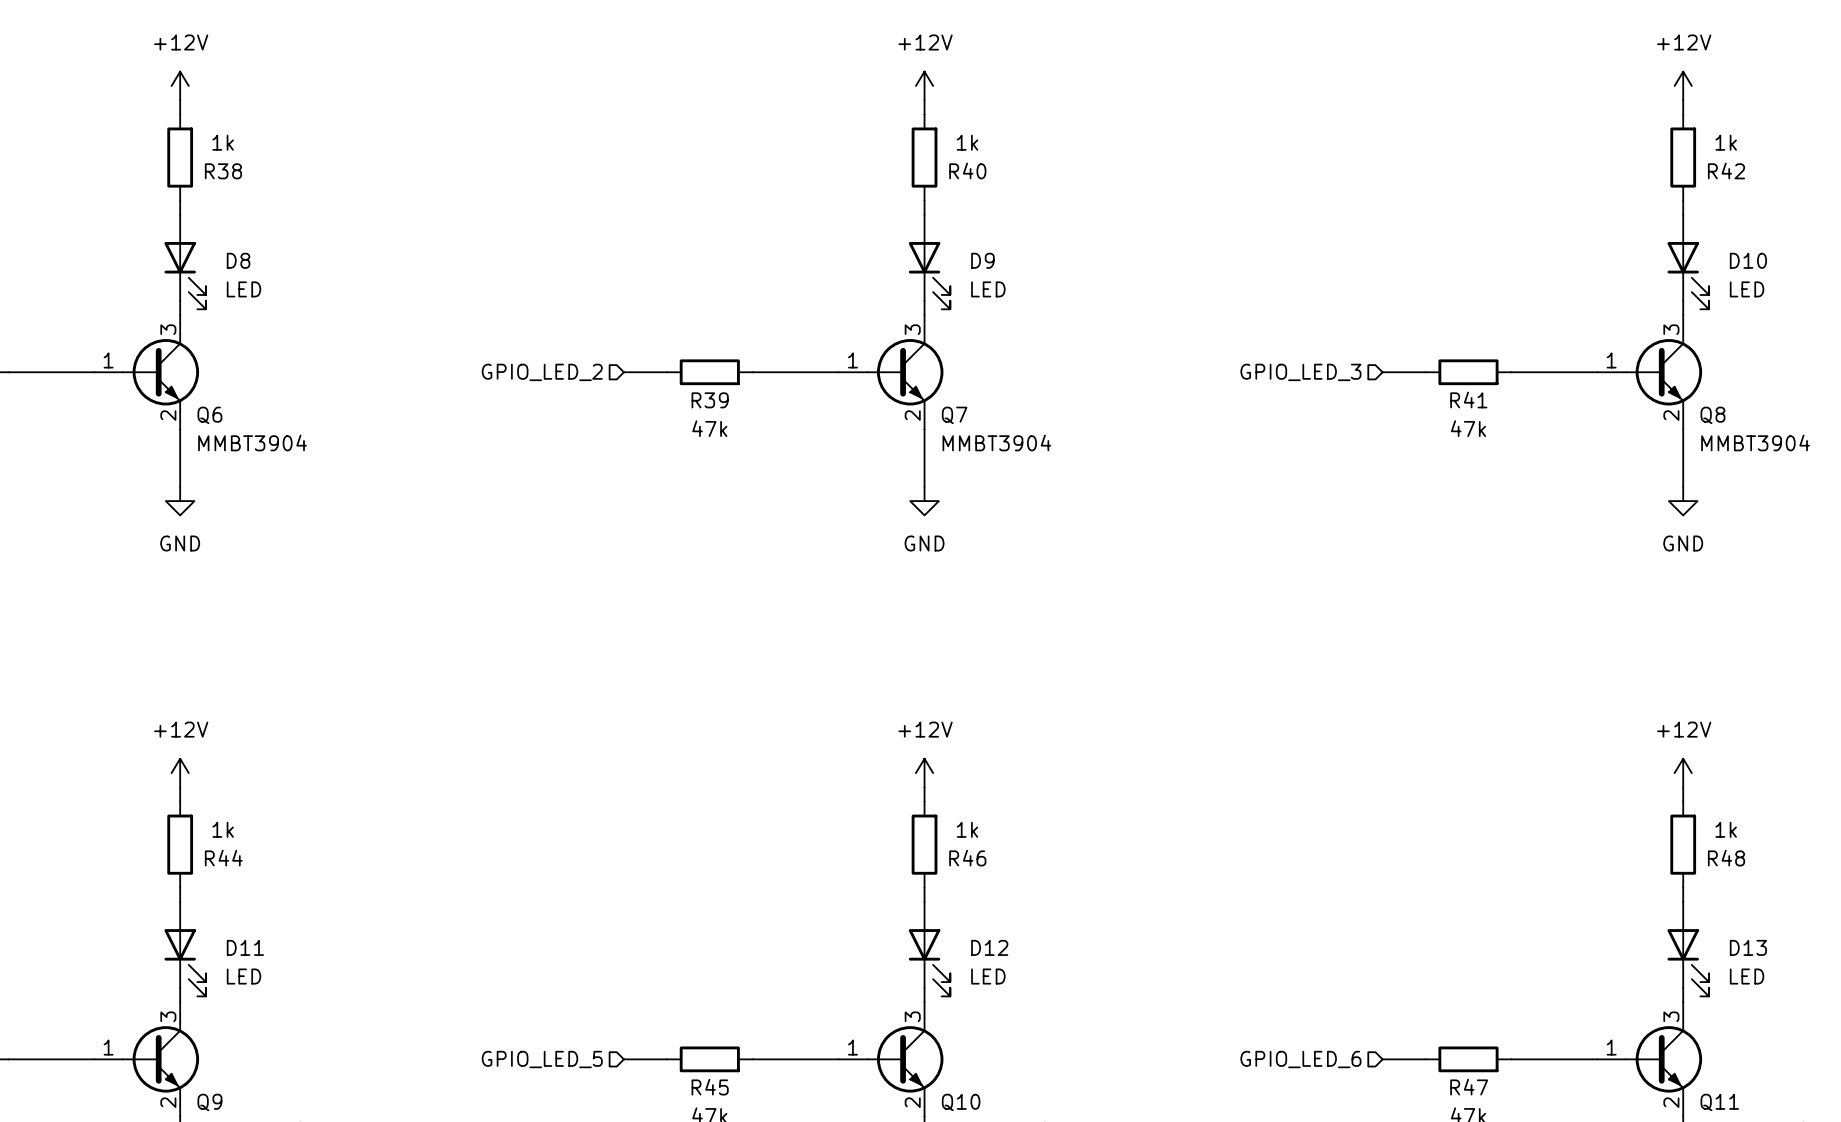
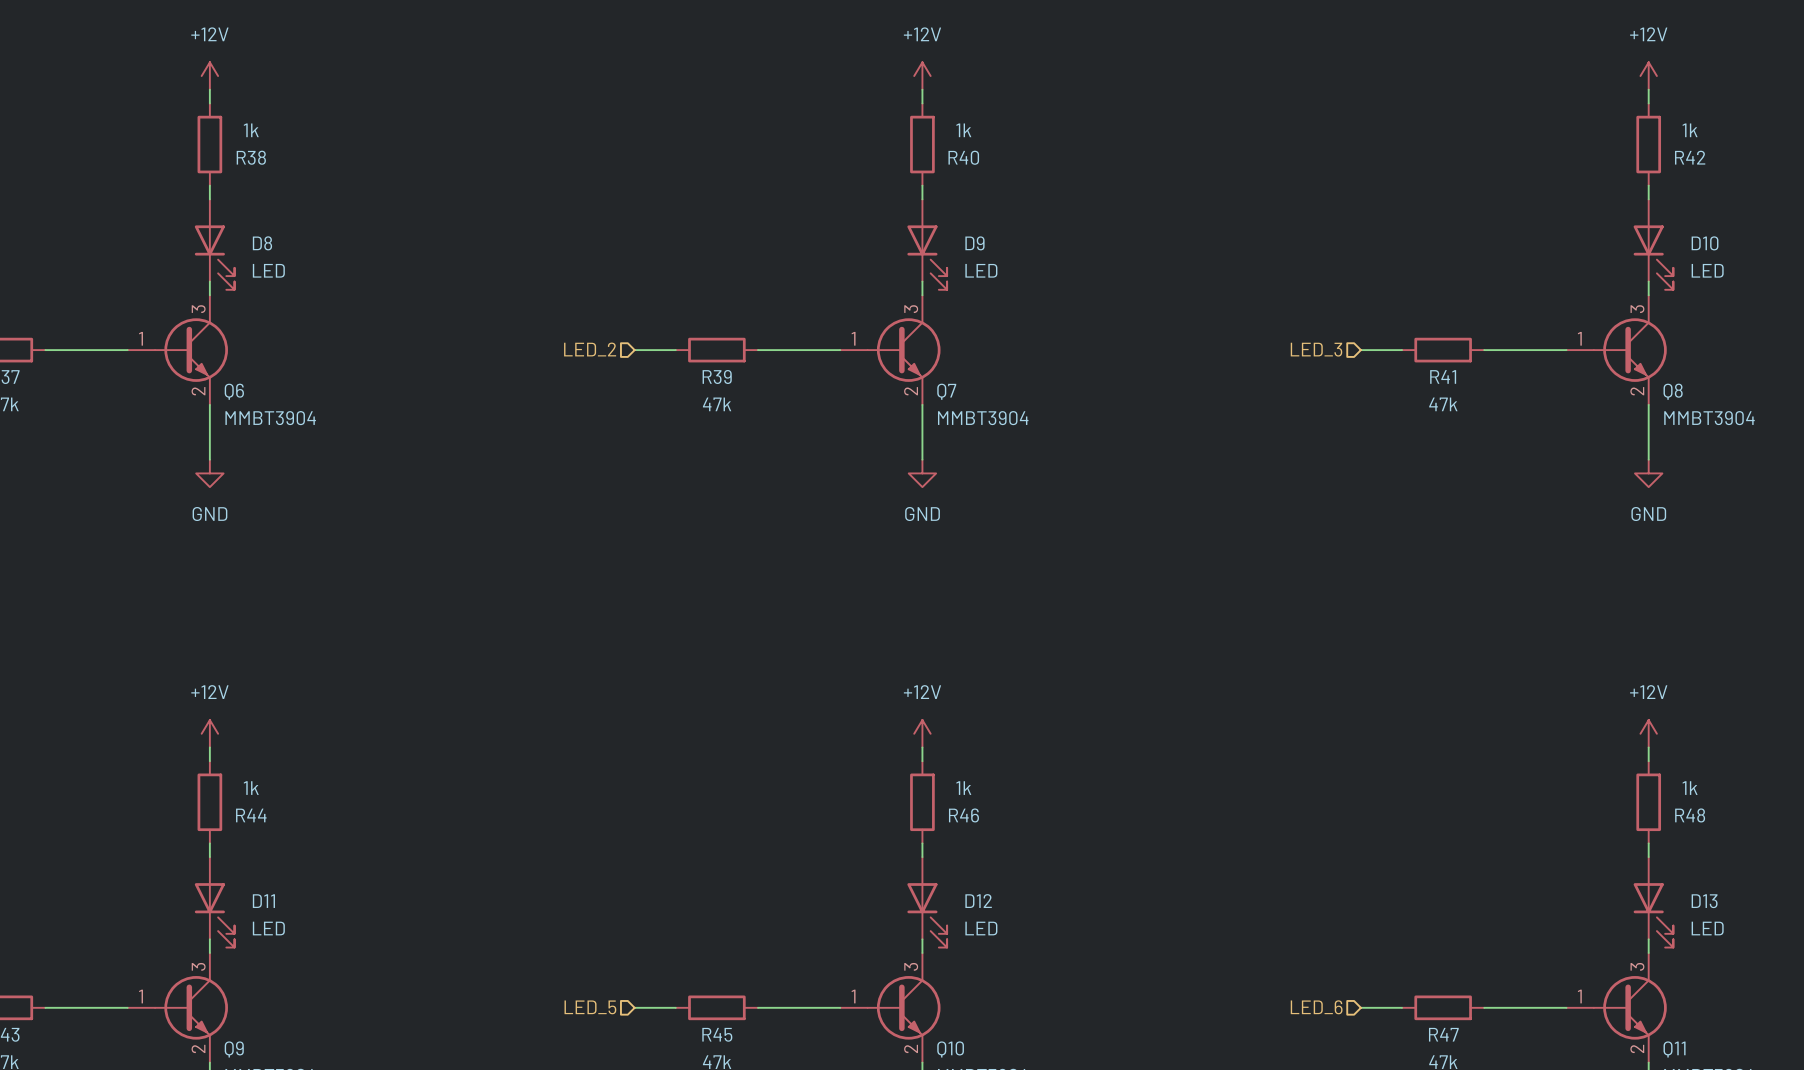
hierarchical label: GPIO_LED_2 (542, 372) -> LED_2 (590, 349)
hierarchical label: GPIO_LED_3 (1300, 372) -> LED_3 (1316, 349)
hierarchical label: GPIO_LED_5 (542, 1059) -> LED_5 (590, 1007)
hierarchical label: GPIO_LED_6 (1300, 1059) -> LED_6 (1316, 1007)

